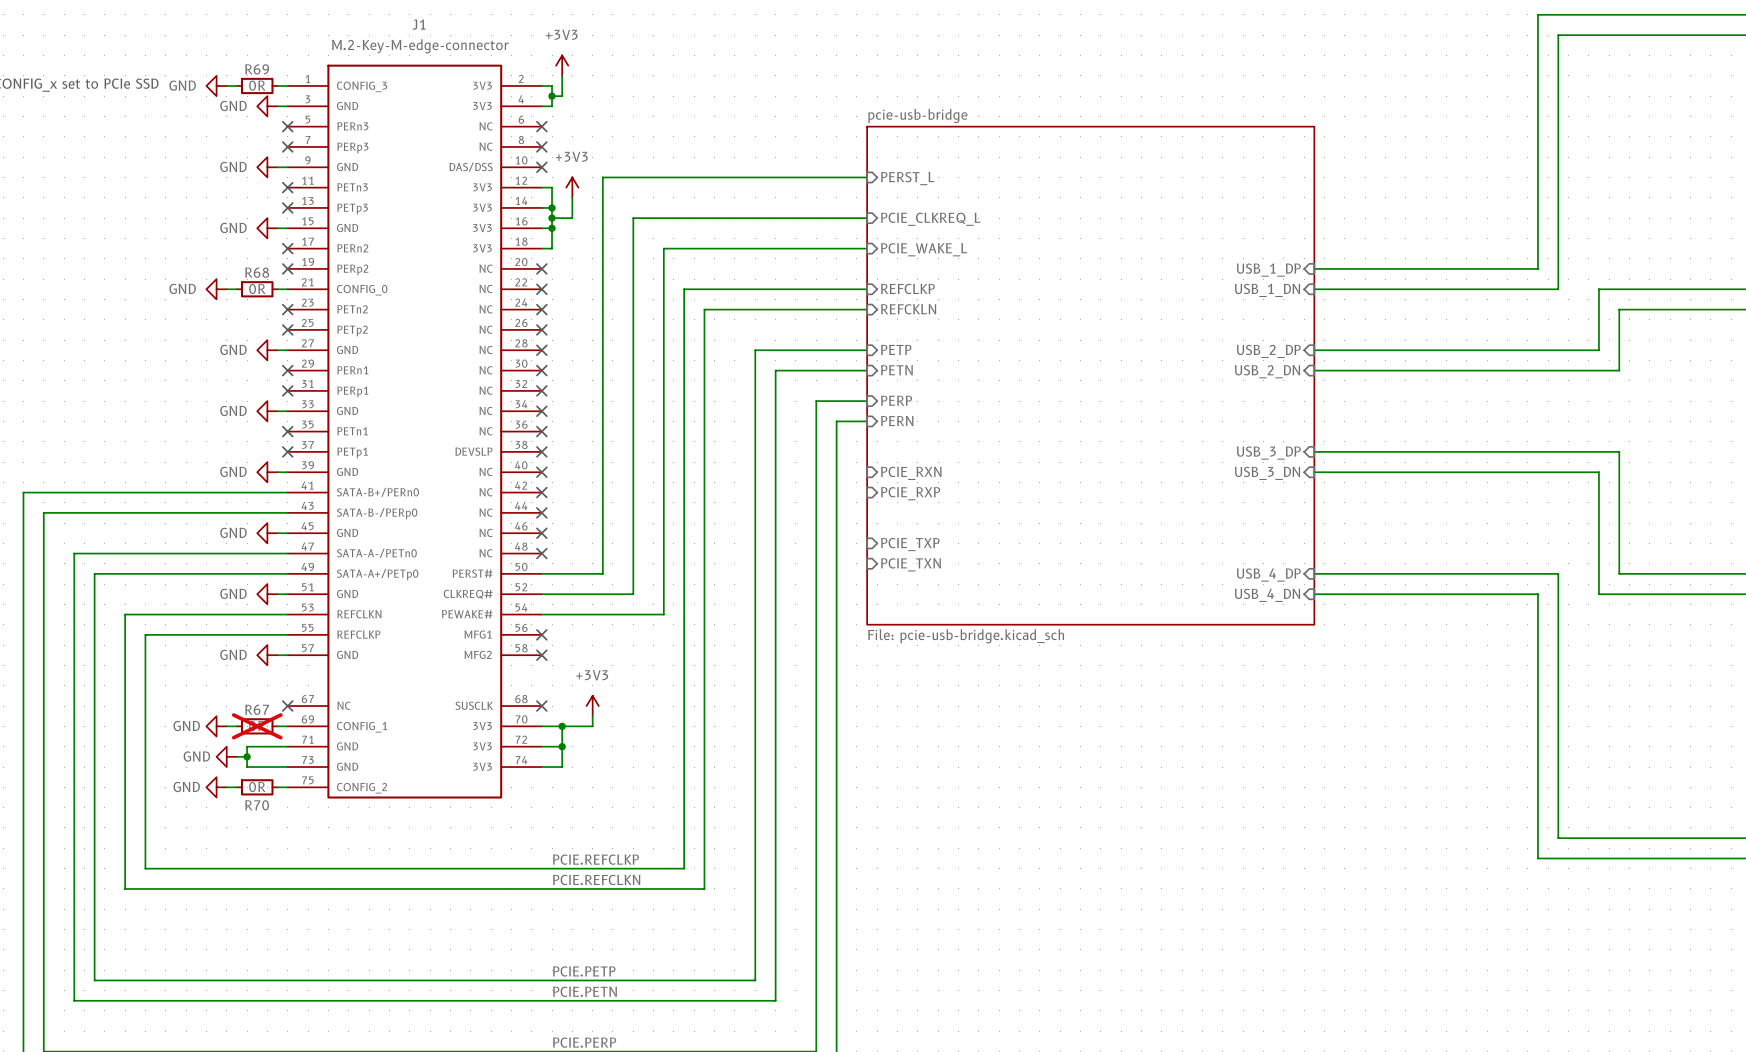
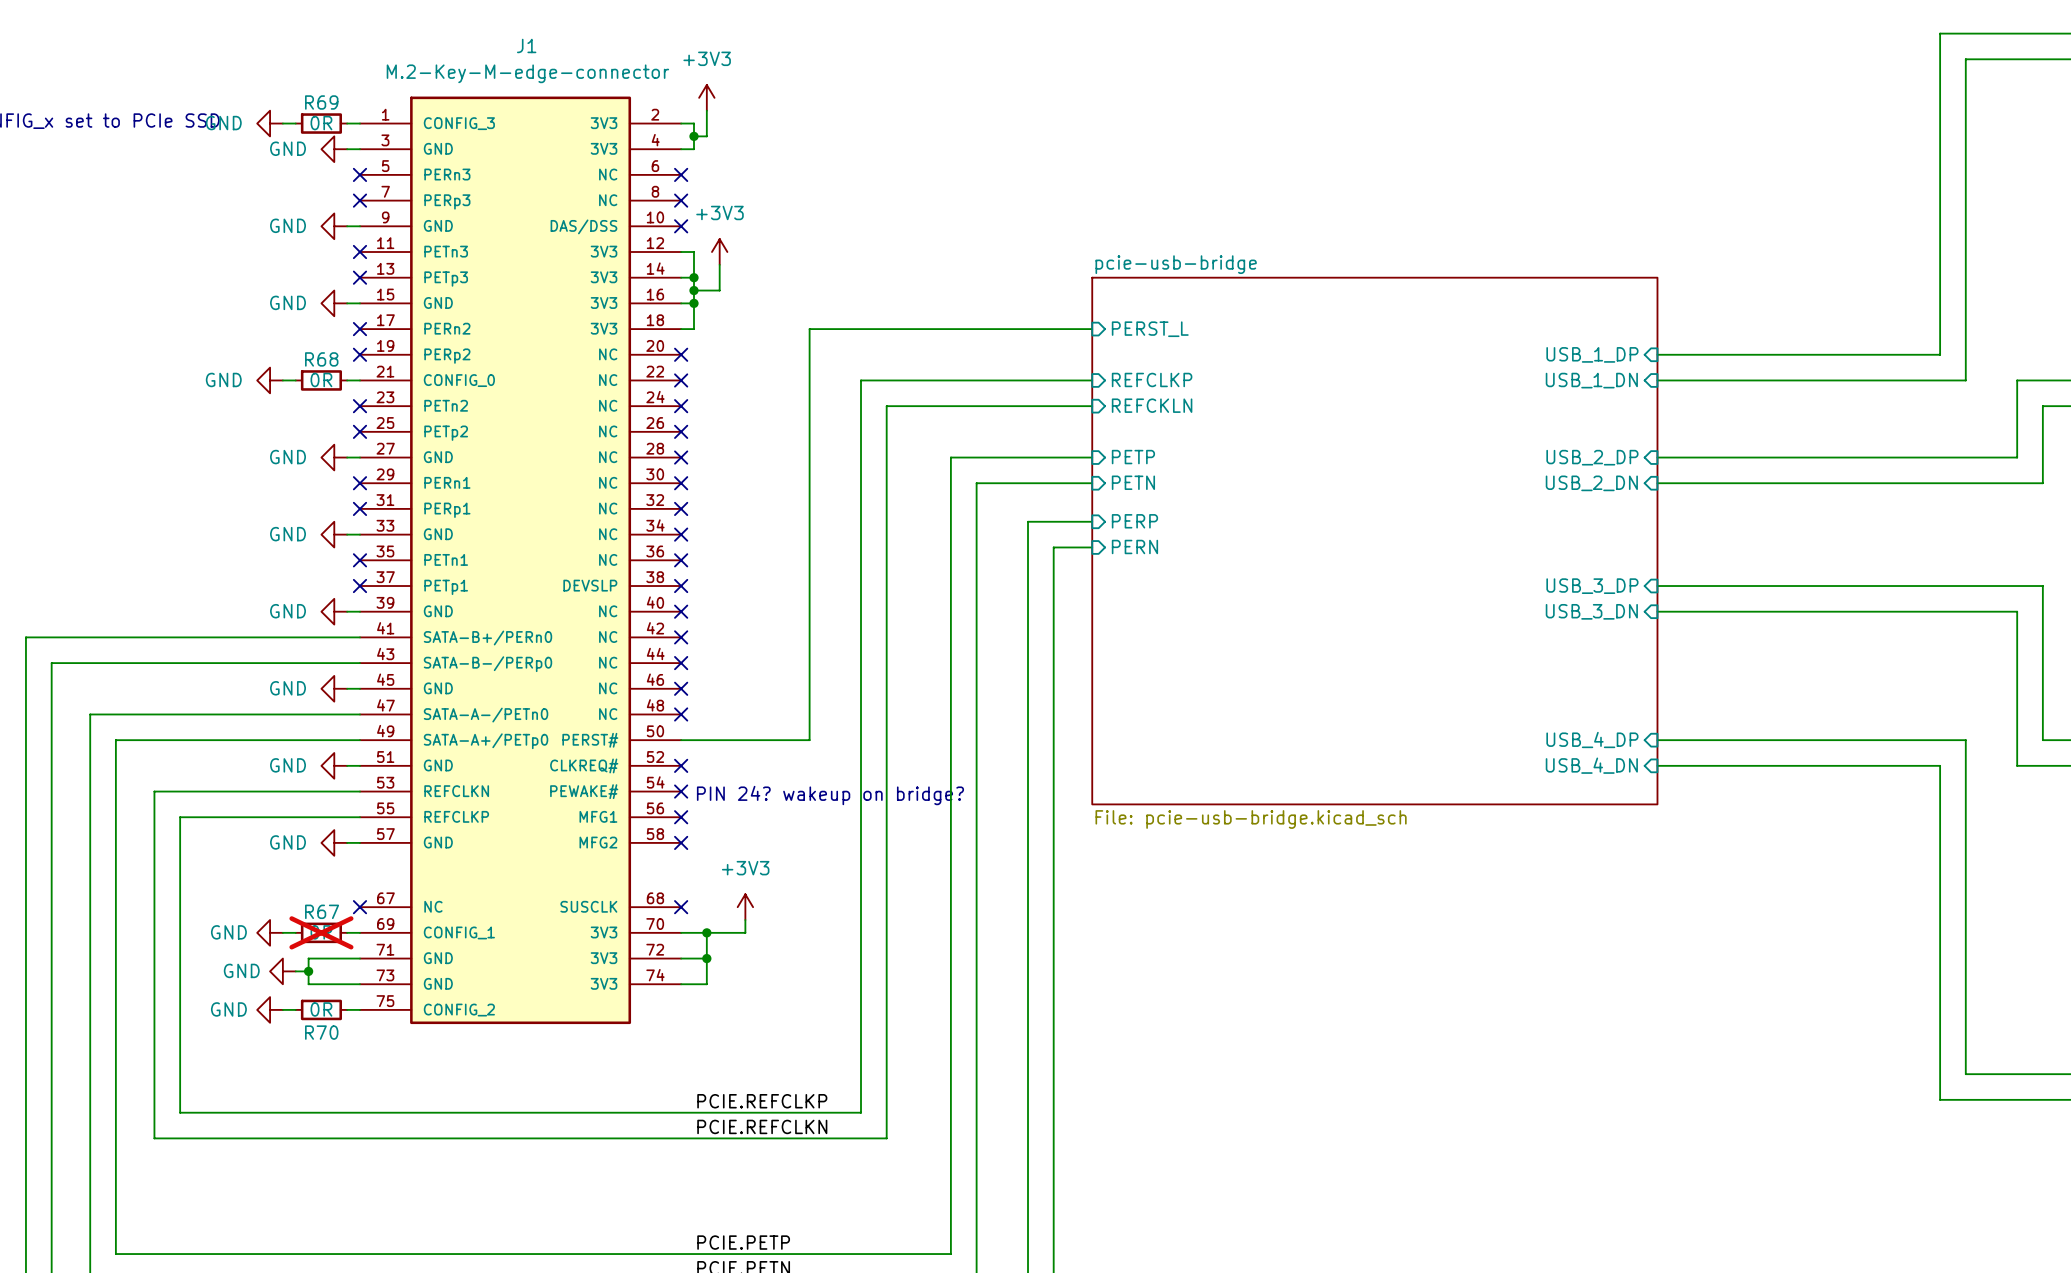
wire: (867, 177) (602, 177) (602, 573) -> none
sheet pin: PERST_L (907, 178) -> none
wire: (867, 218) (633, 218) (633, 594) (541, 594) -> none
sheet pin: PCIE_CLKREQ_L (930, 219) -> none
wire: (663, 248) (663, 614) (541, 614) -> (835, 329) (809, 329) (809, 740) (758, 740)
sheet pin: PCIE_WAKE_L (924, 249) -> PERST_L (1150, 329)
sheet pcie-usb-bridge: File: pcie-usb-bridge.kicad_sch (1090, 375) -> none
sheet pcie-usb-bridge: none -> File: pcie-usb-bridge.kicad_sch (1374, 541)
sheet pin: PCIE_RXN (911, 473) -> none
sheet pin: PCIE_RXP (910, 493) -> none
sheet pin: PCIE_TXP (910, 544) -> none
sheet pin: PCIE_TXN (910, 564) -> none
no-connect mark: none -> (681, 765)
no-connect mark: none -> (681, 791)
text: none -> PIN 24? wakeup on bridge? (830, 795)

